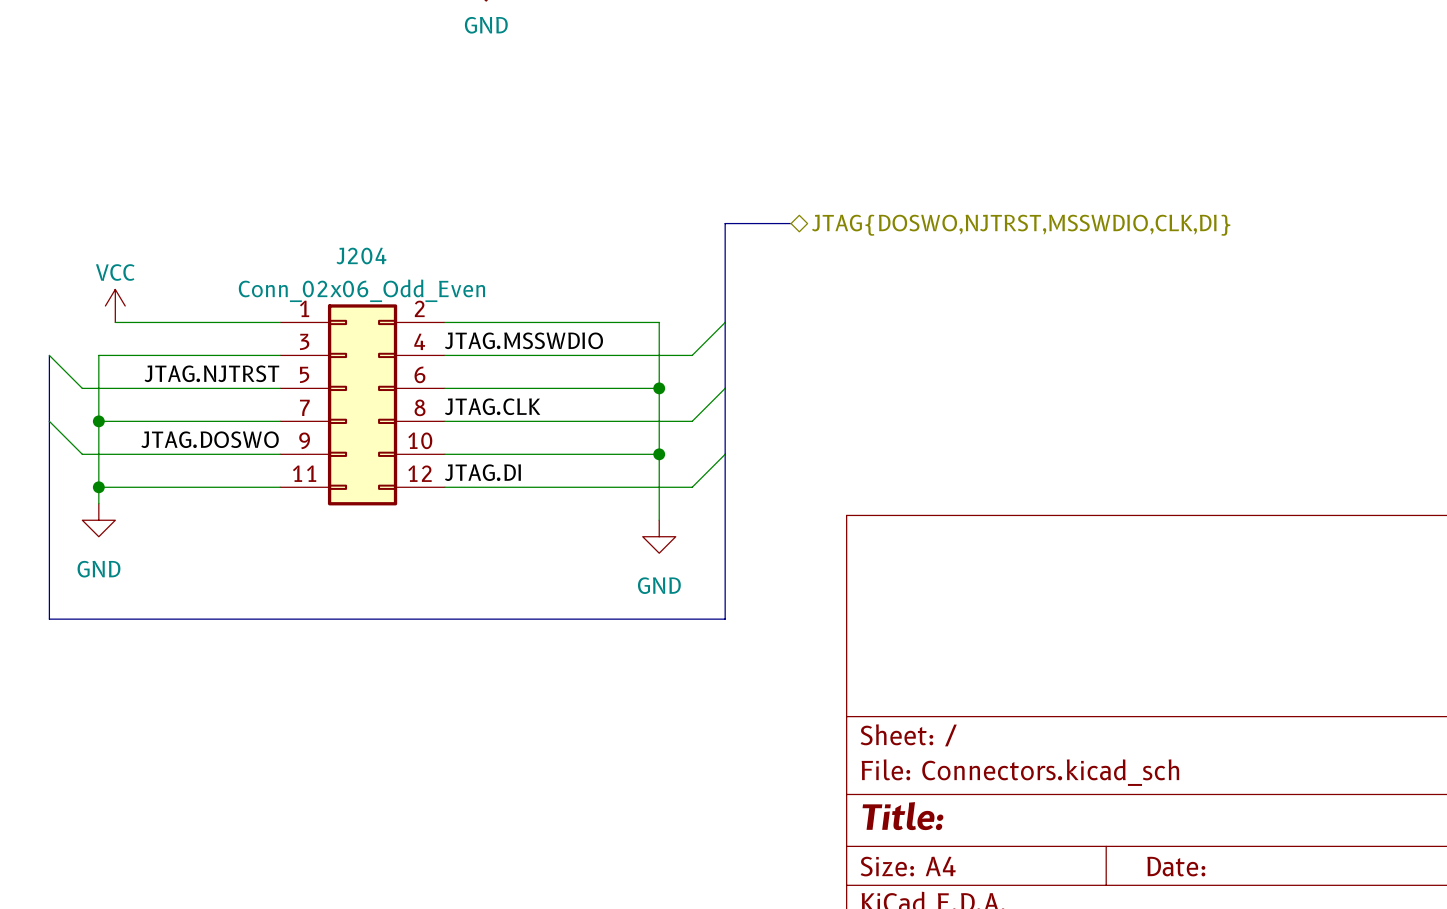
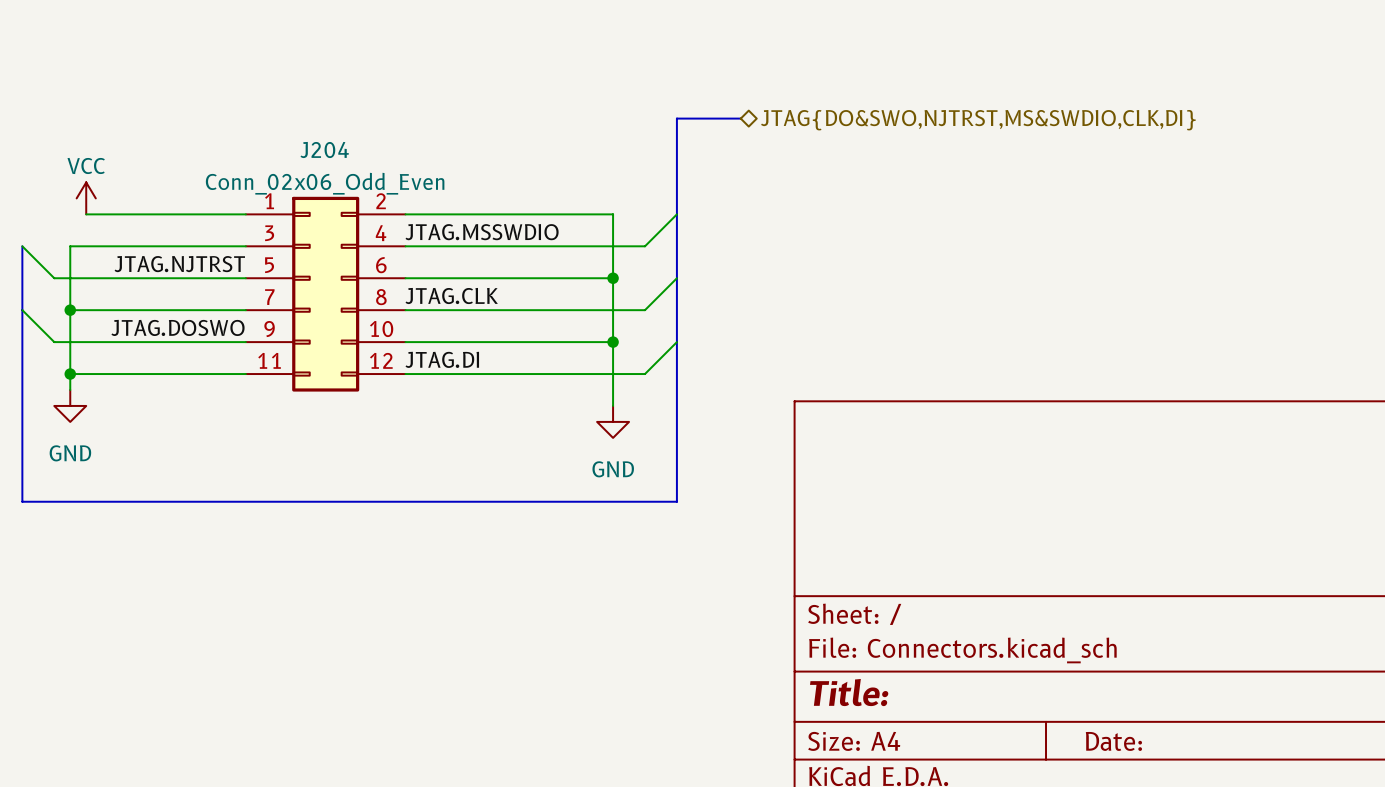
hierarchical label: JTAG{DOSWO,NJTRST,MSSWDIO,CLK,DI} (1021, 225) -> JTAG{DO&SWO,NJTRST,MS&SWDIO,CLK,DI} (978, 120)

